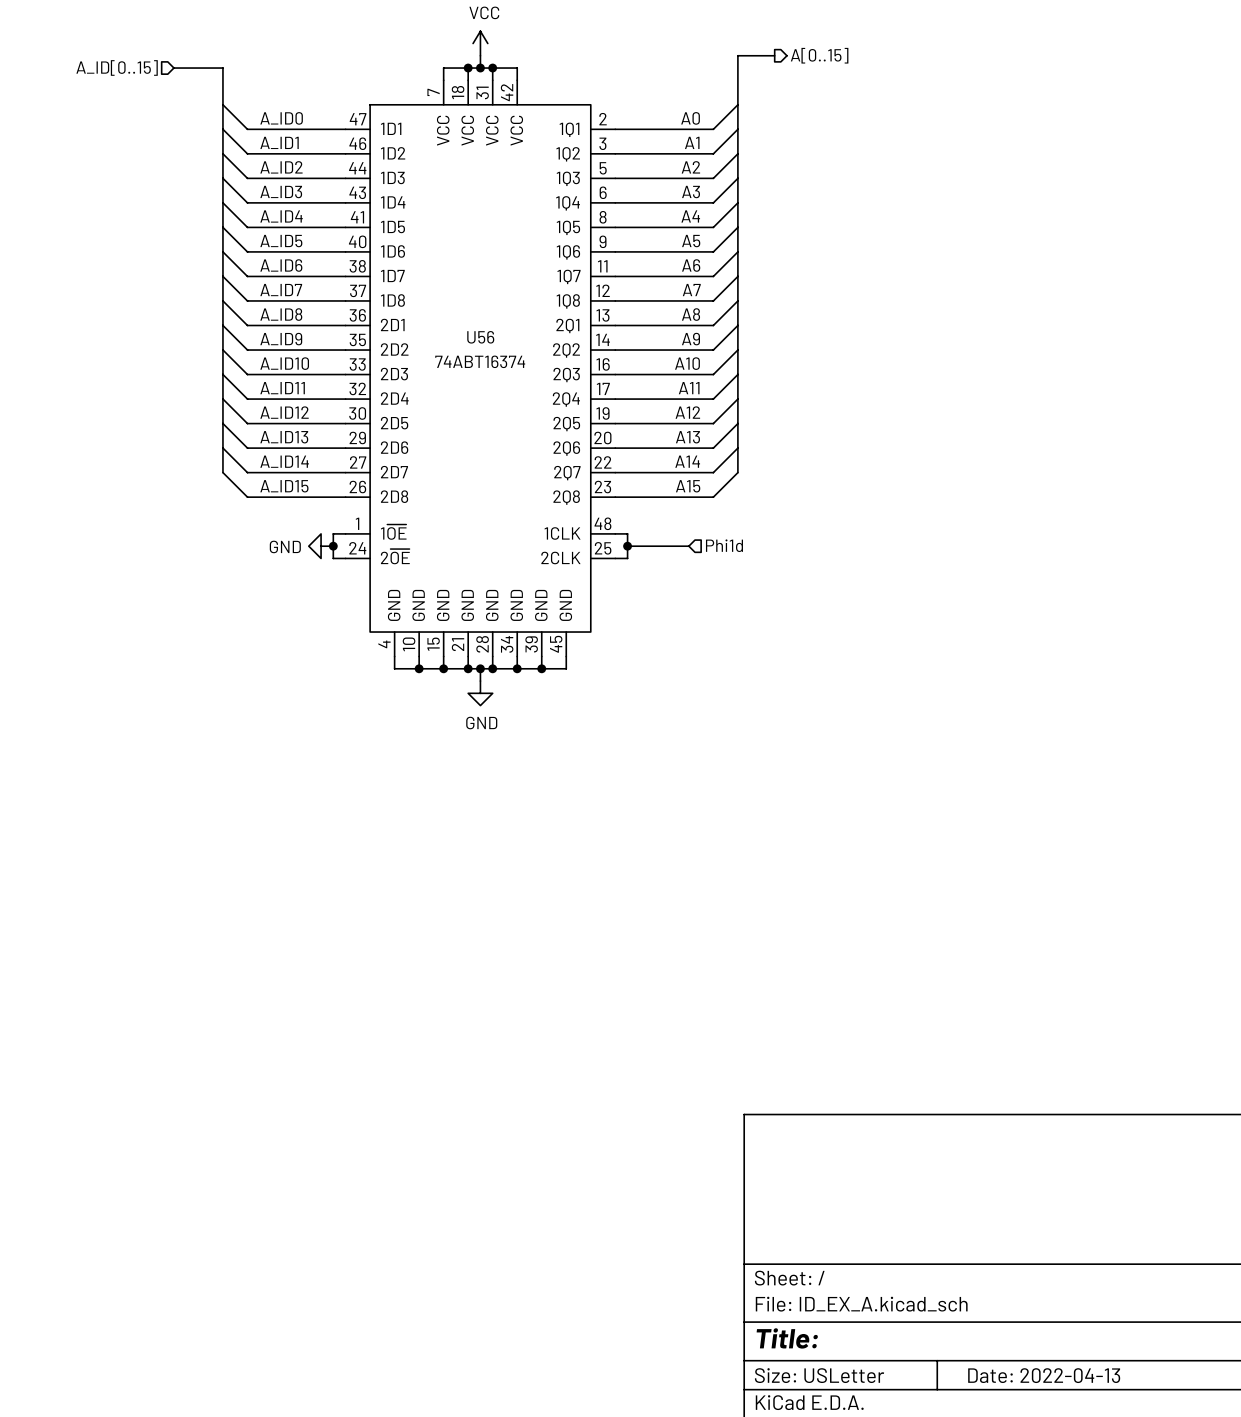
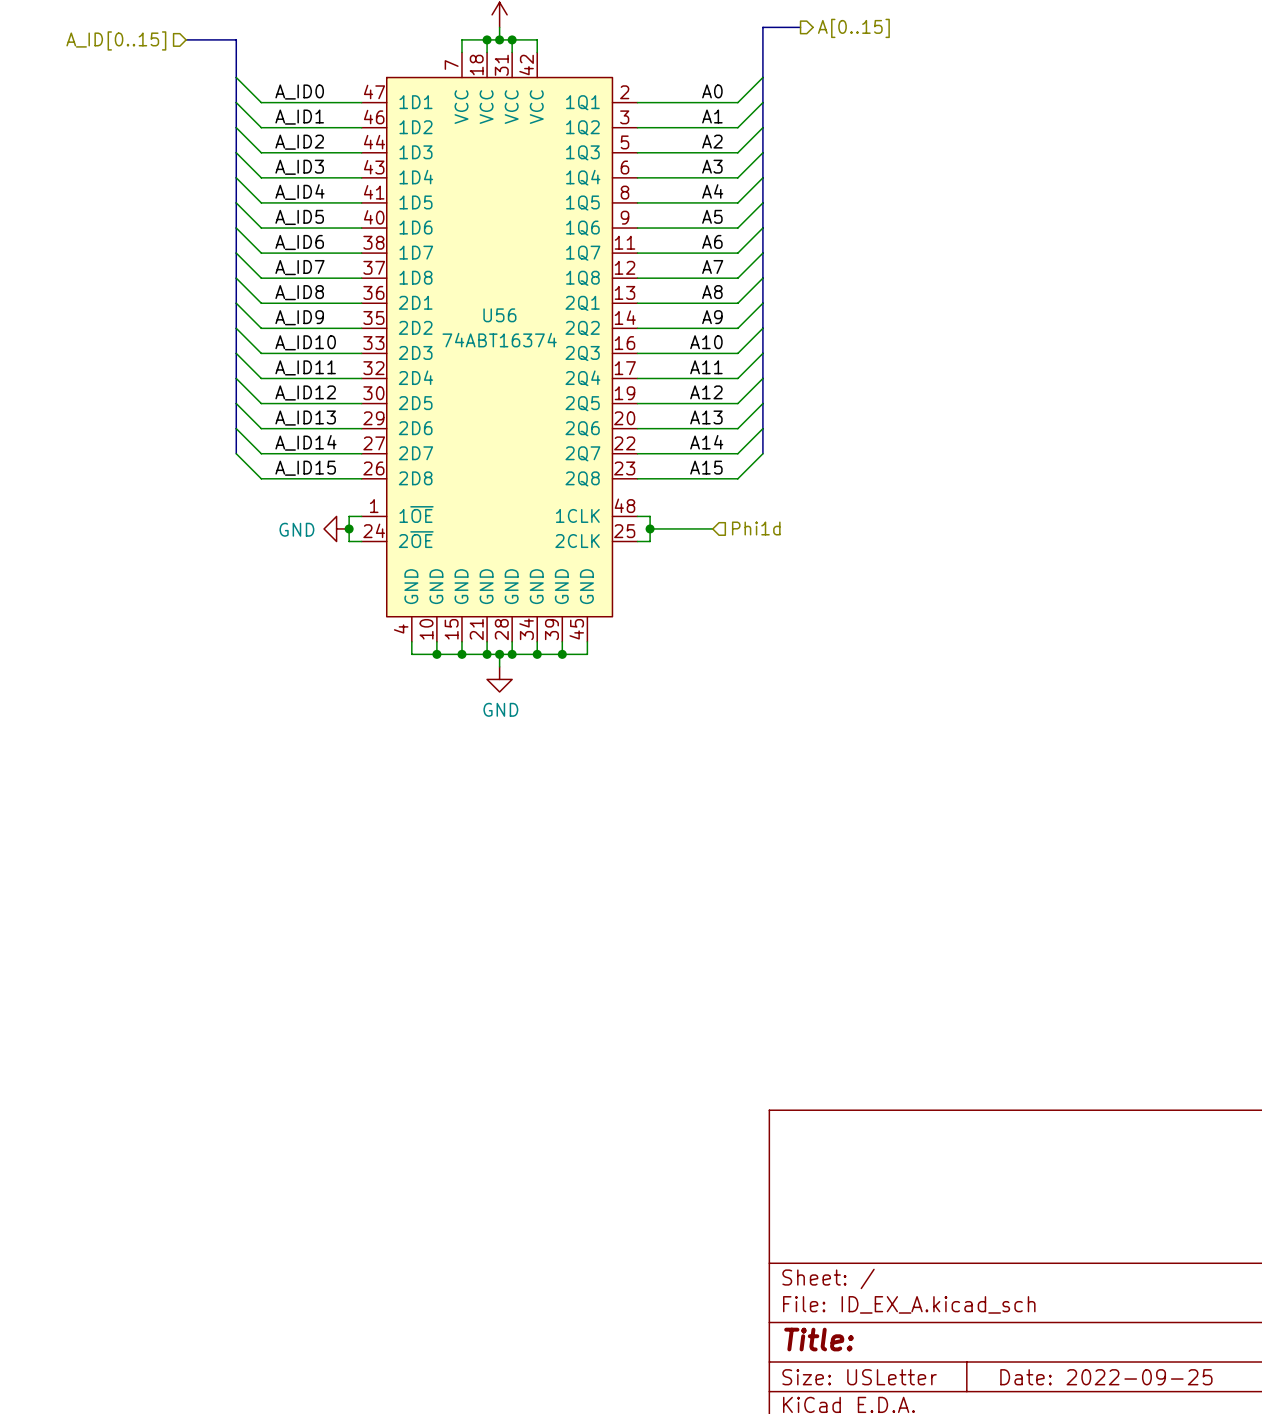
title block: Date: 2022-04-13 (1044, 1375) -> Date: 2022-09-25 (1106, 1377)

